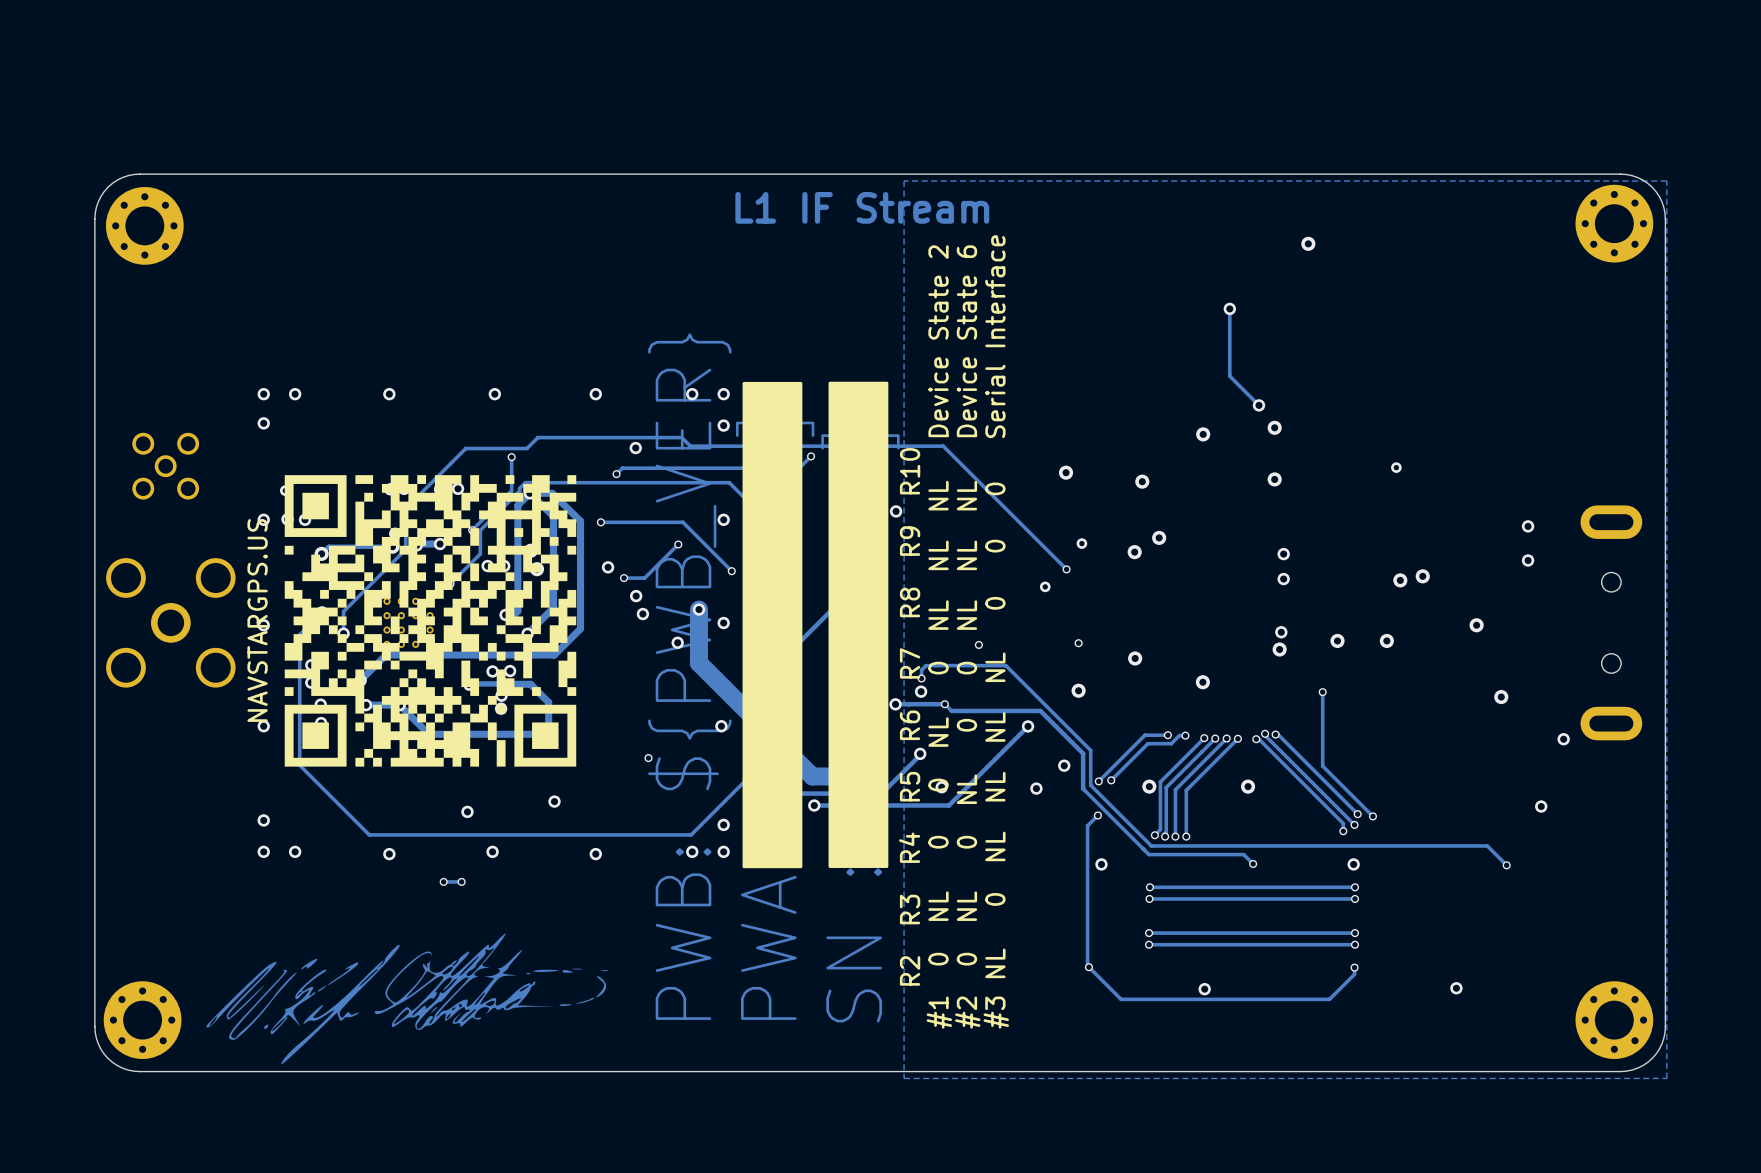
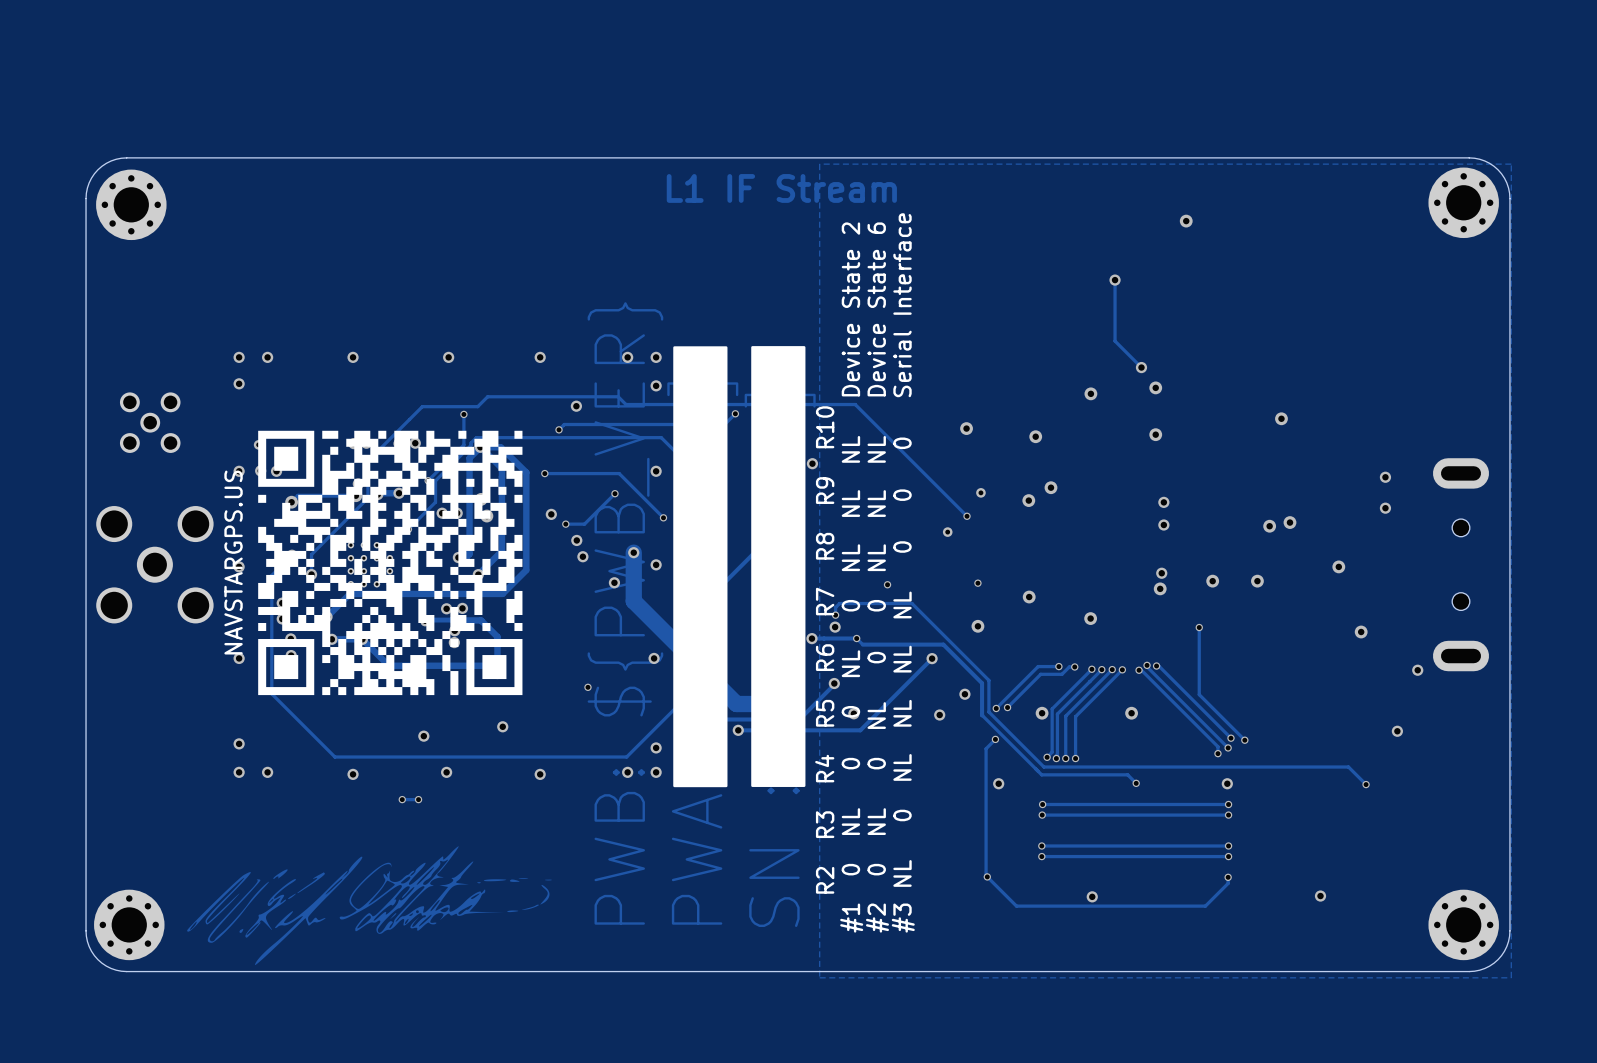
via: none -> (1281, 418)
via: (1396, 467) -> none

